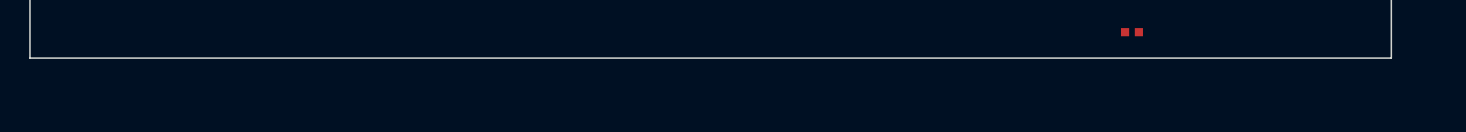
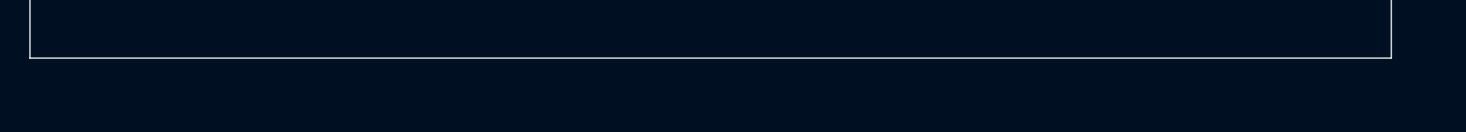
part: (1131, 32) -> none

